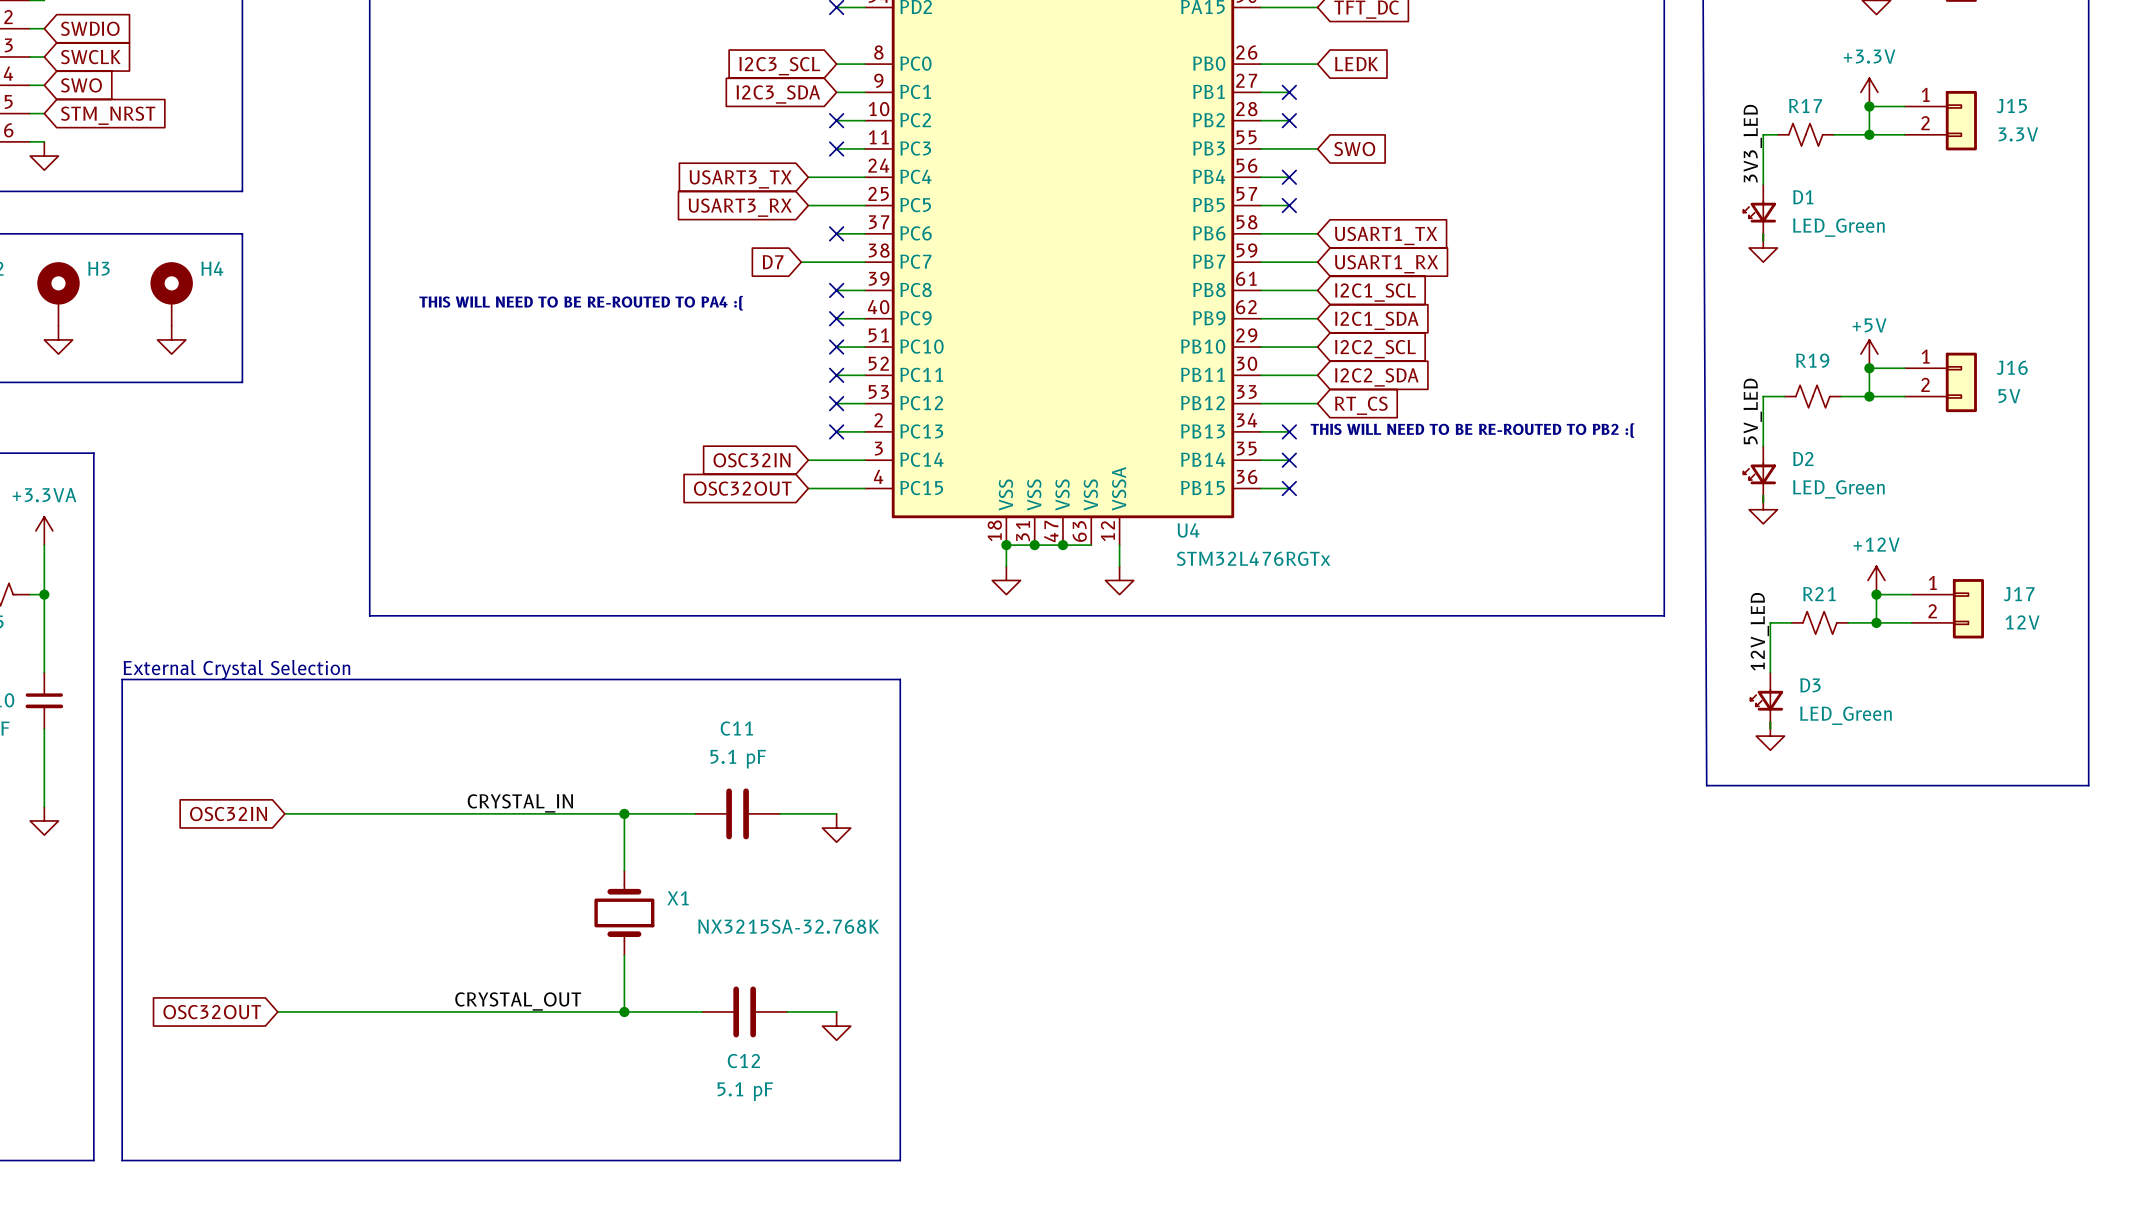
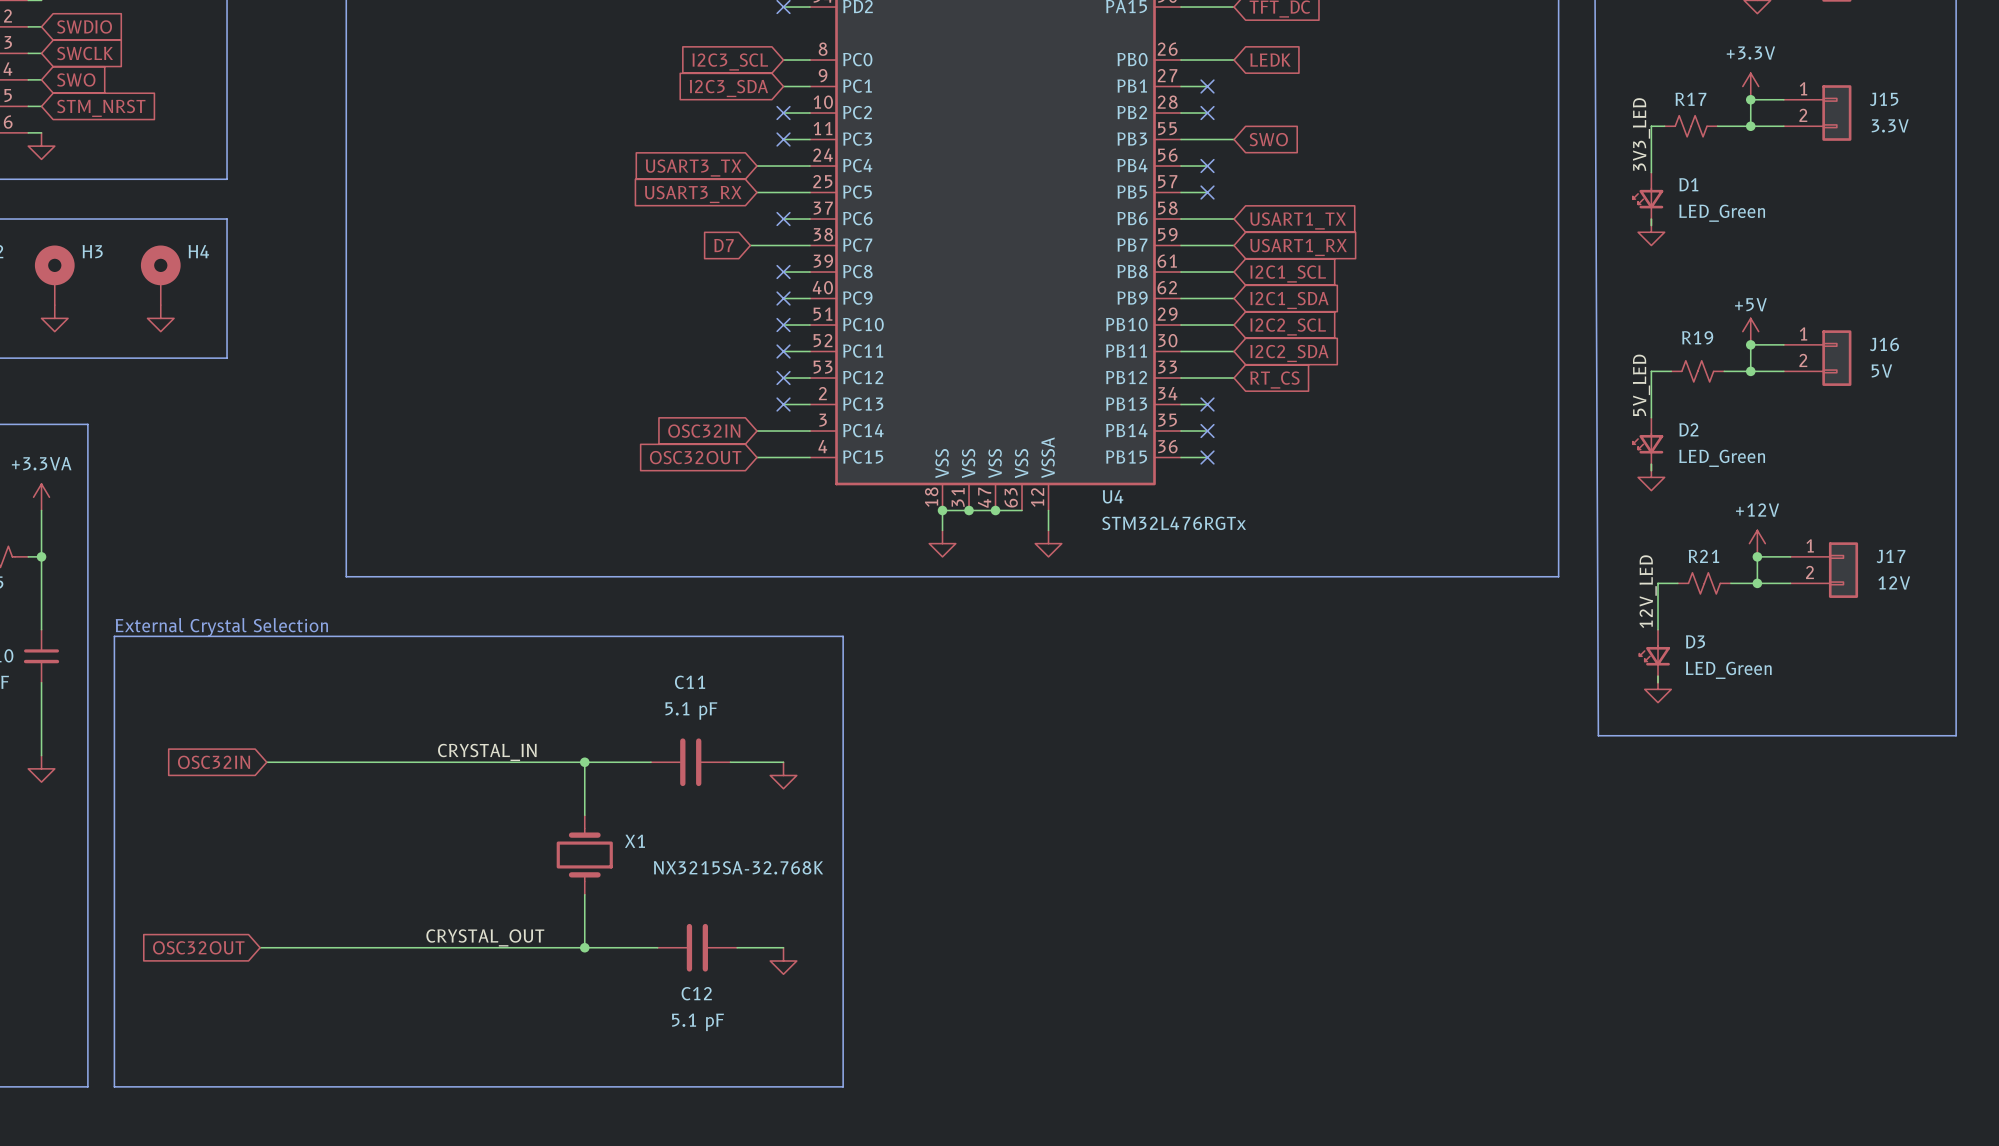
text: THIS WILL NEED TO BE RE-ROUTED TO PA4 :( (581, 303) -> none
text: THIS WILL NEED TO BE RE-ROUTED TO PB2 :( (1472, 430) -> none

